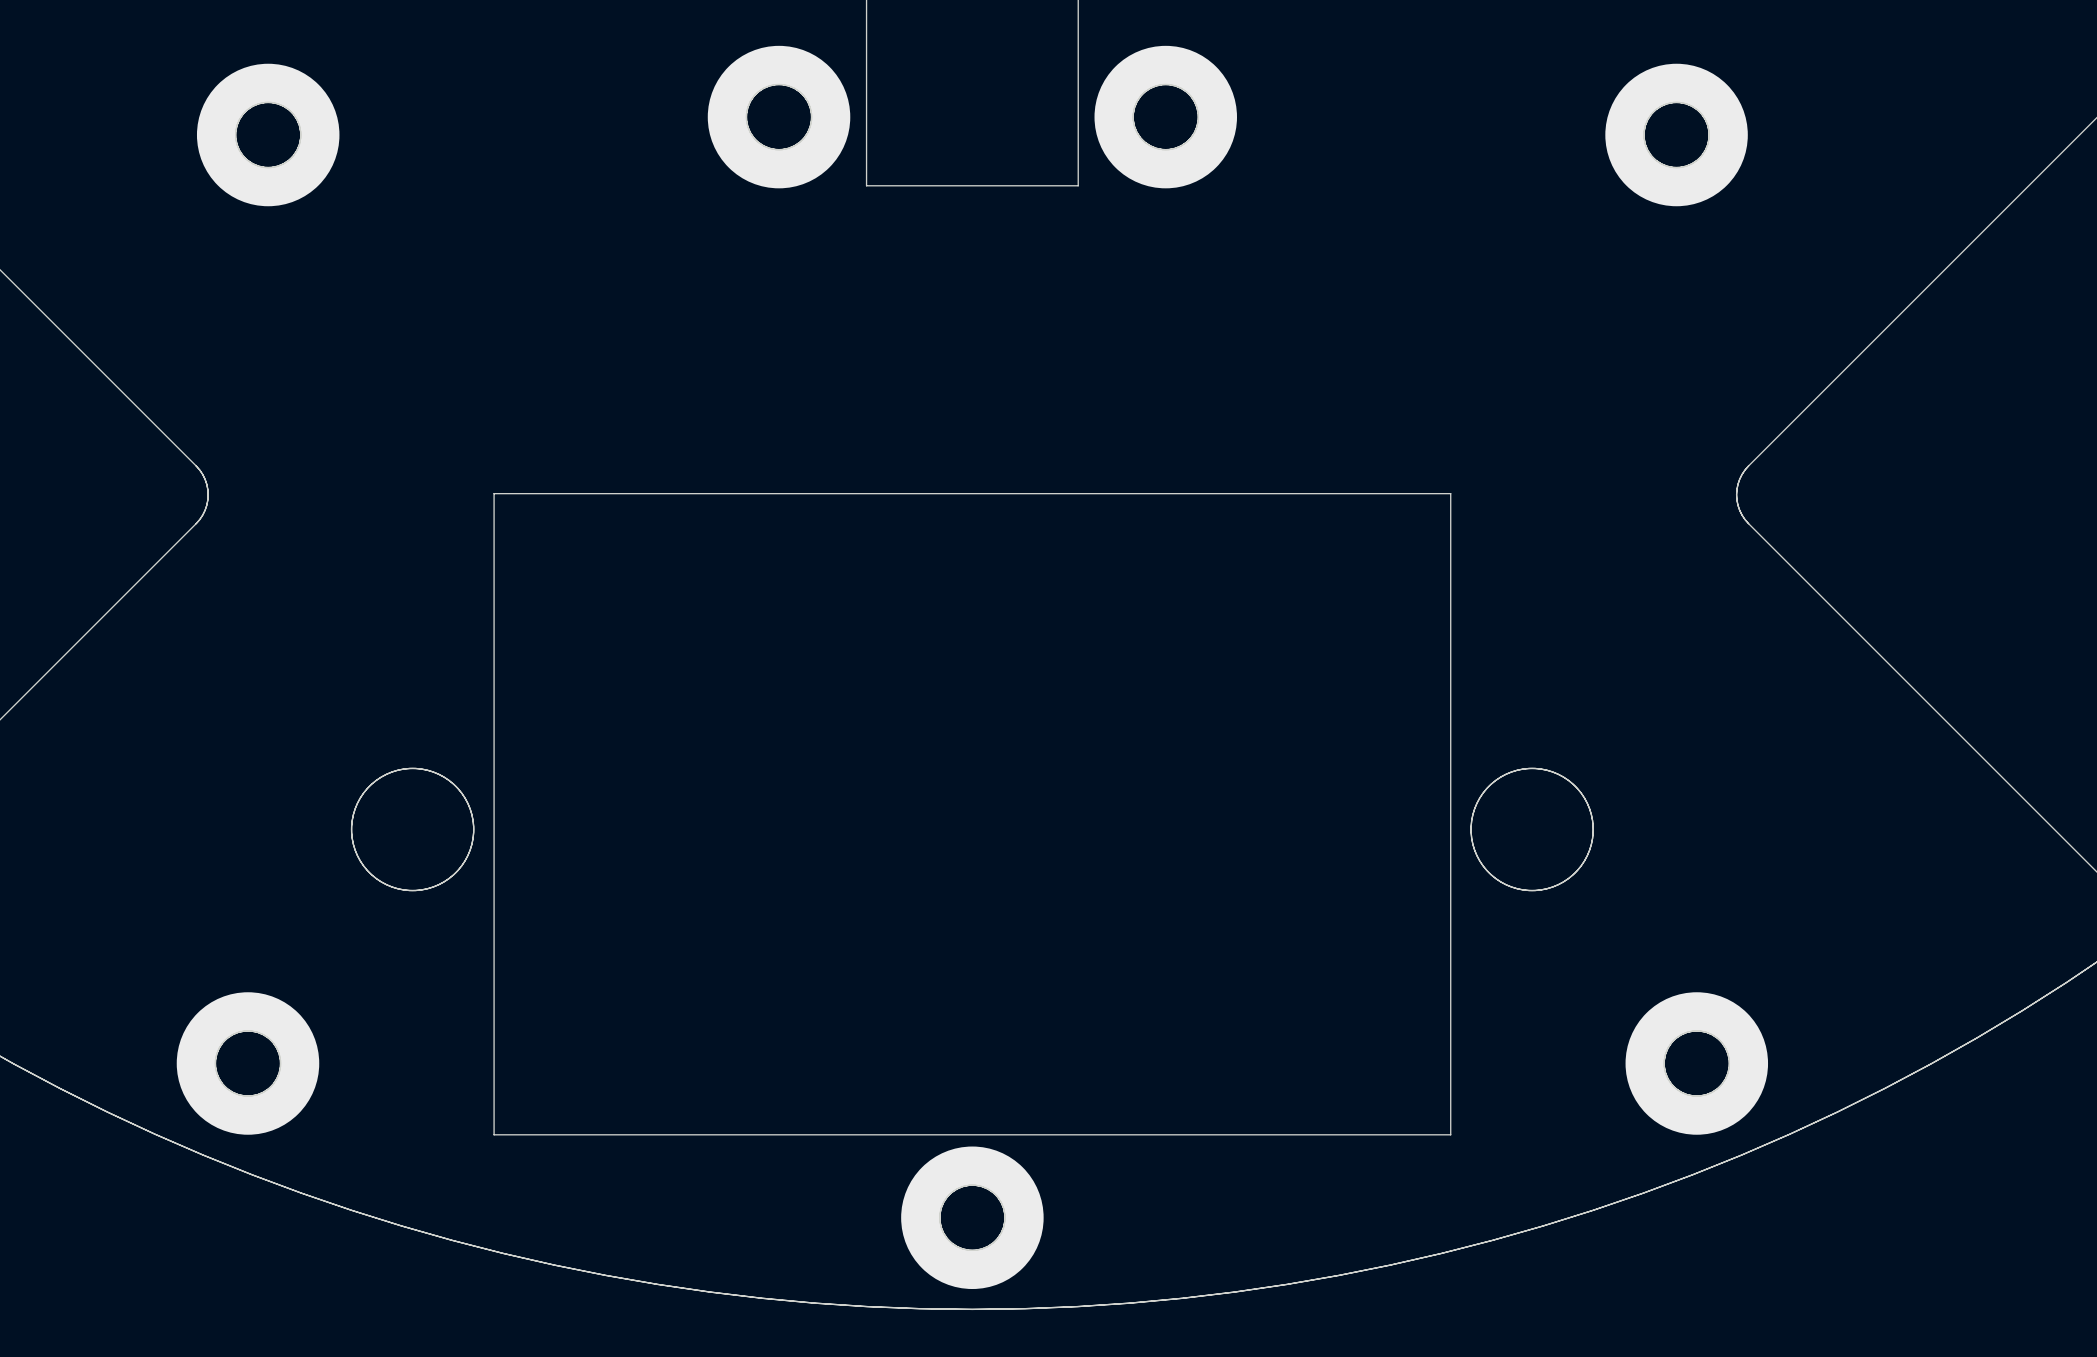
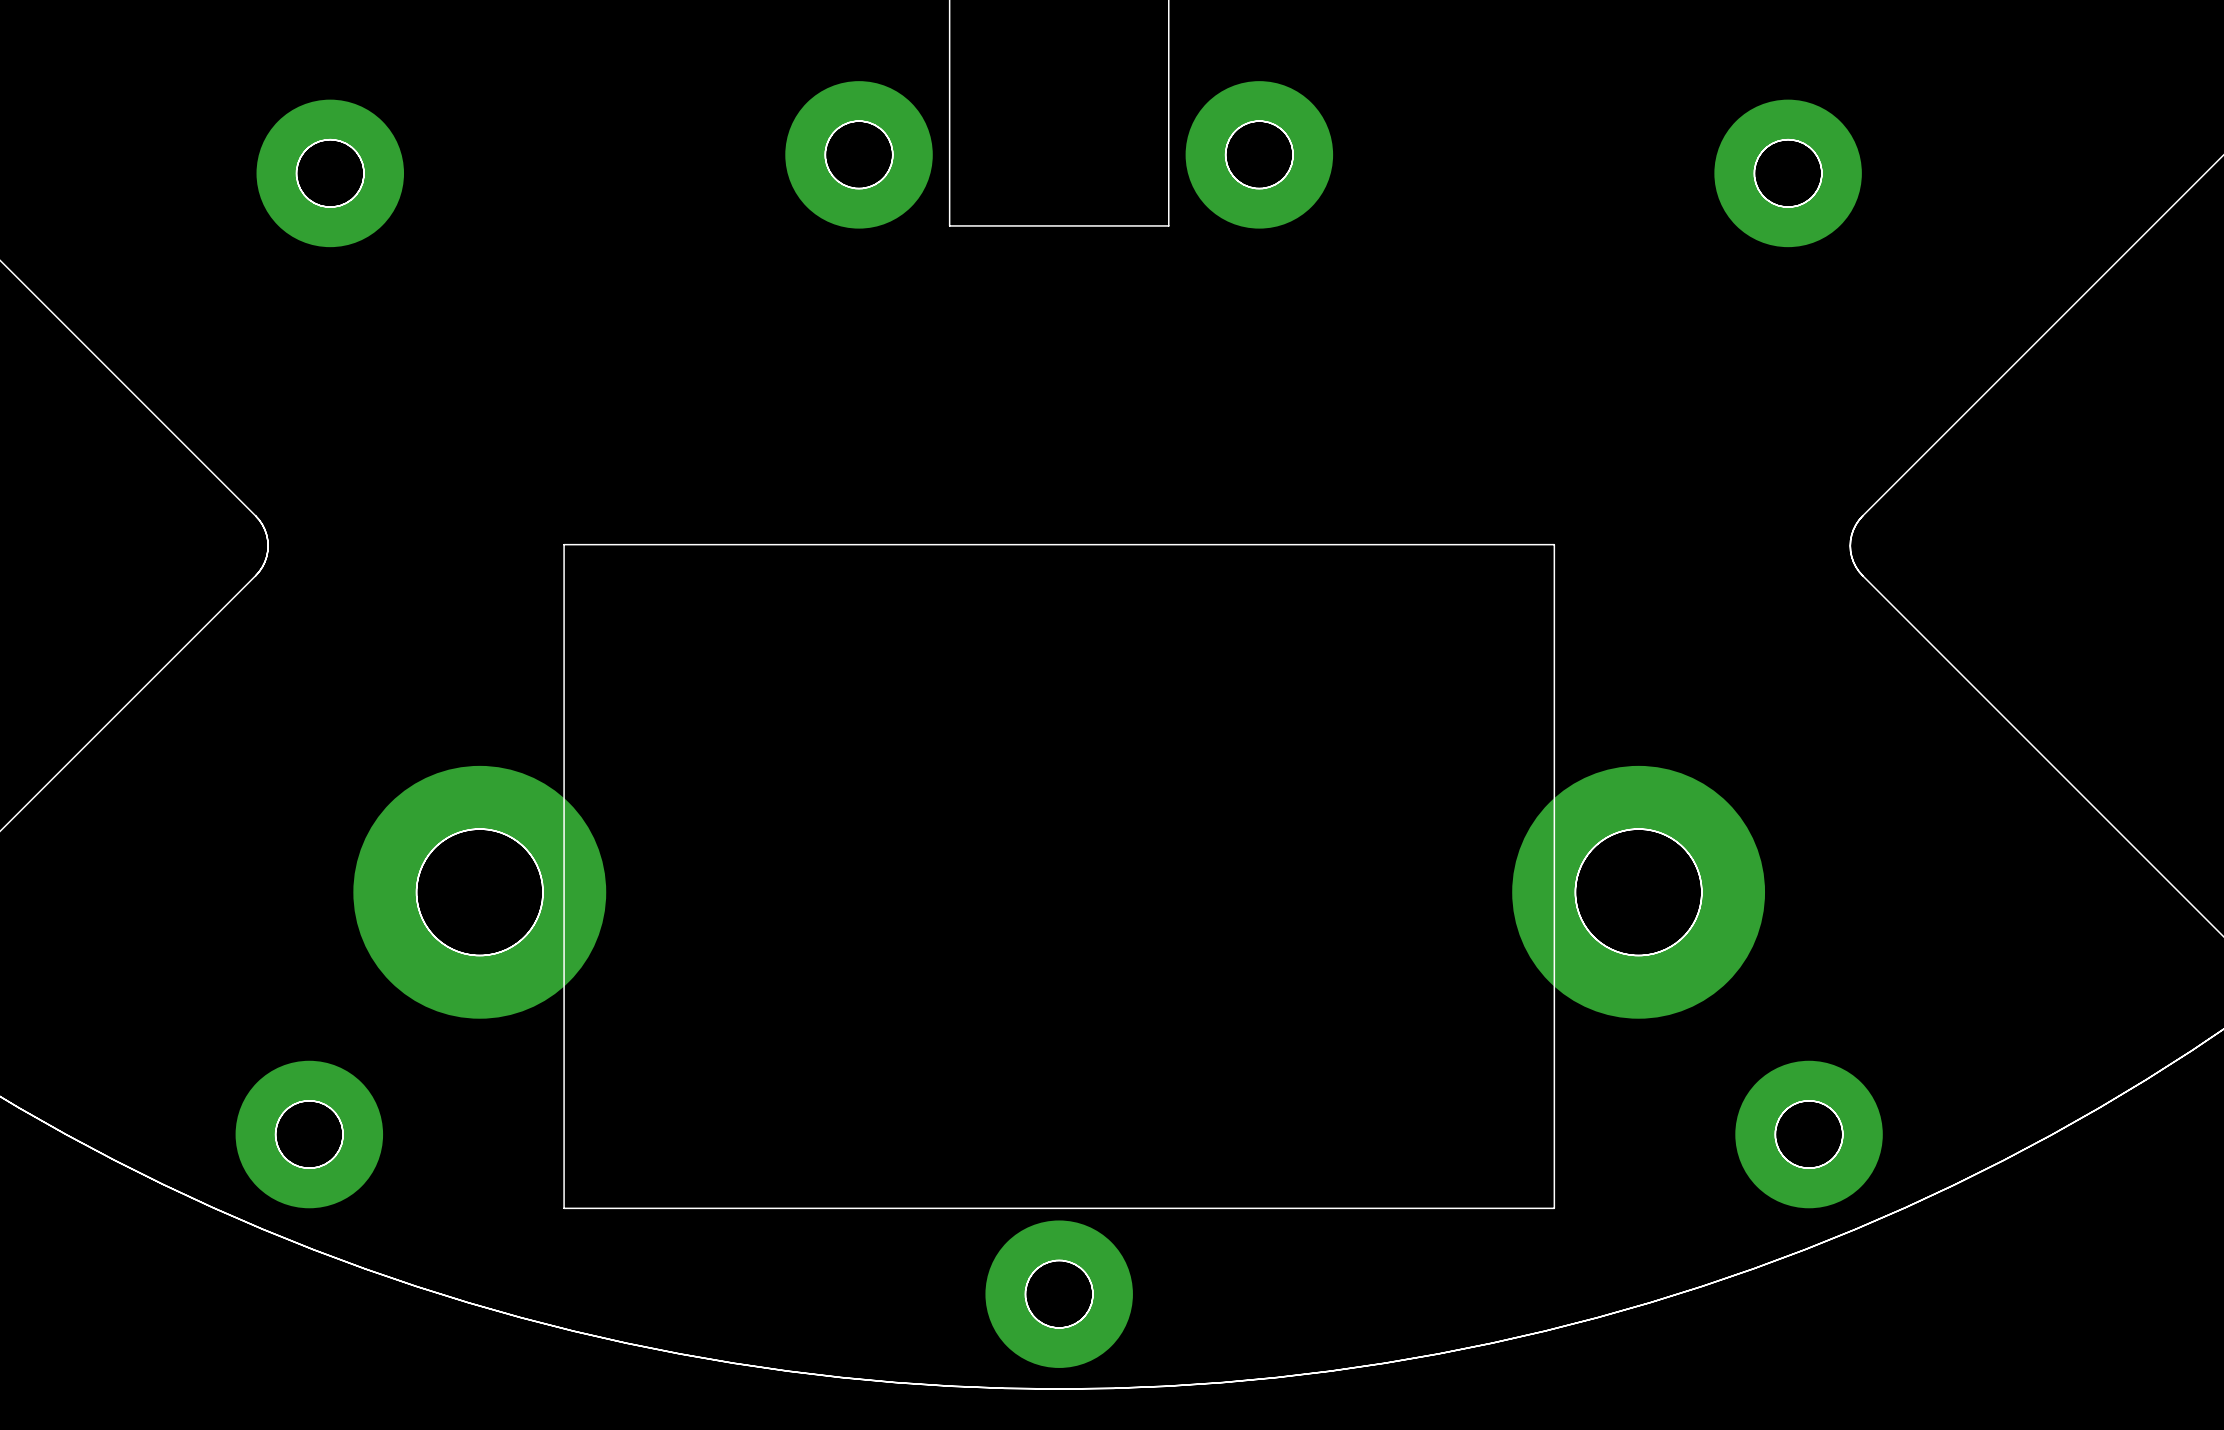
via: none -> (479, 892)
via: none -> (1638, 892)

